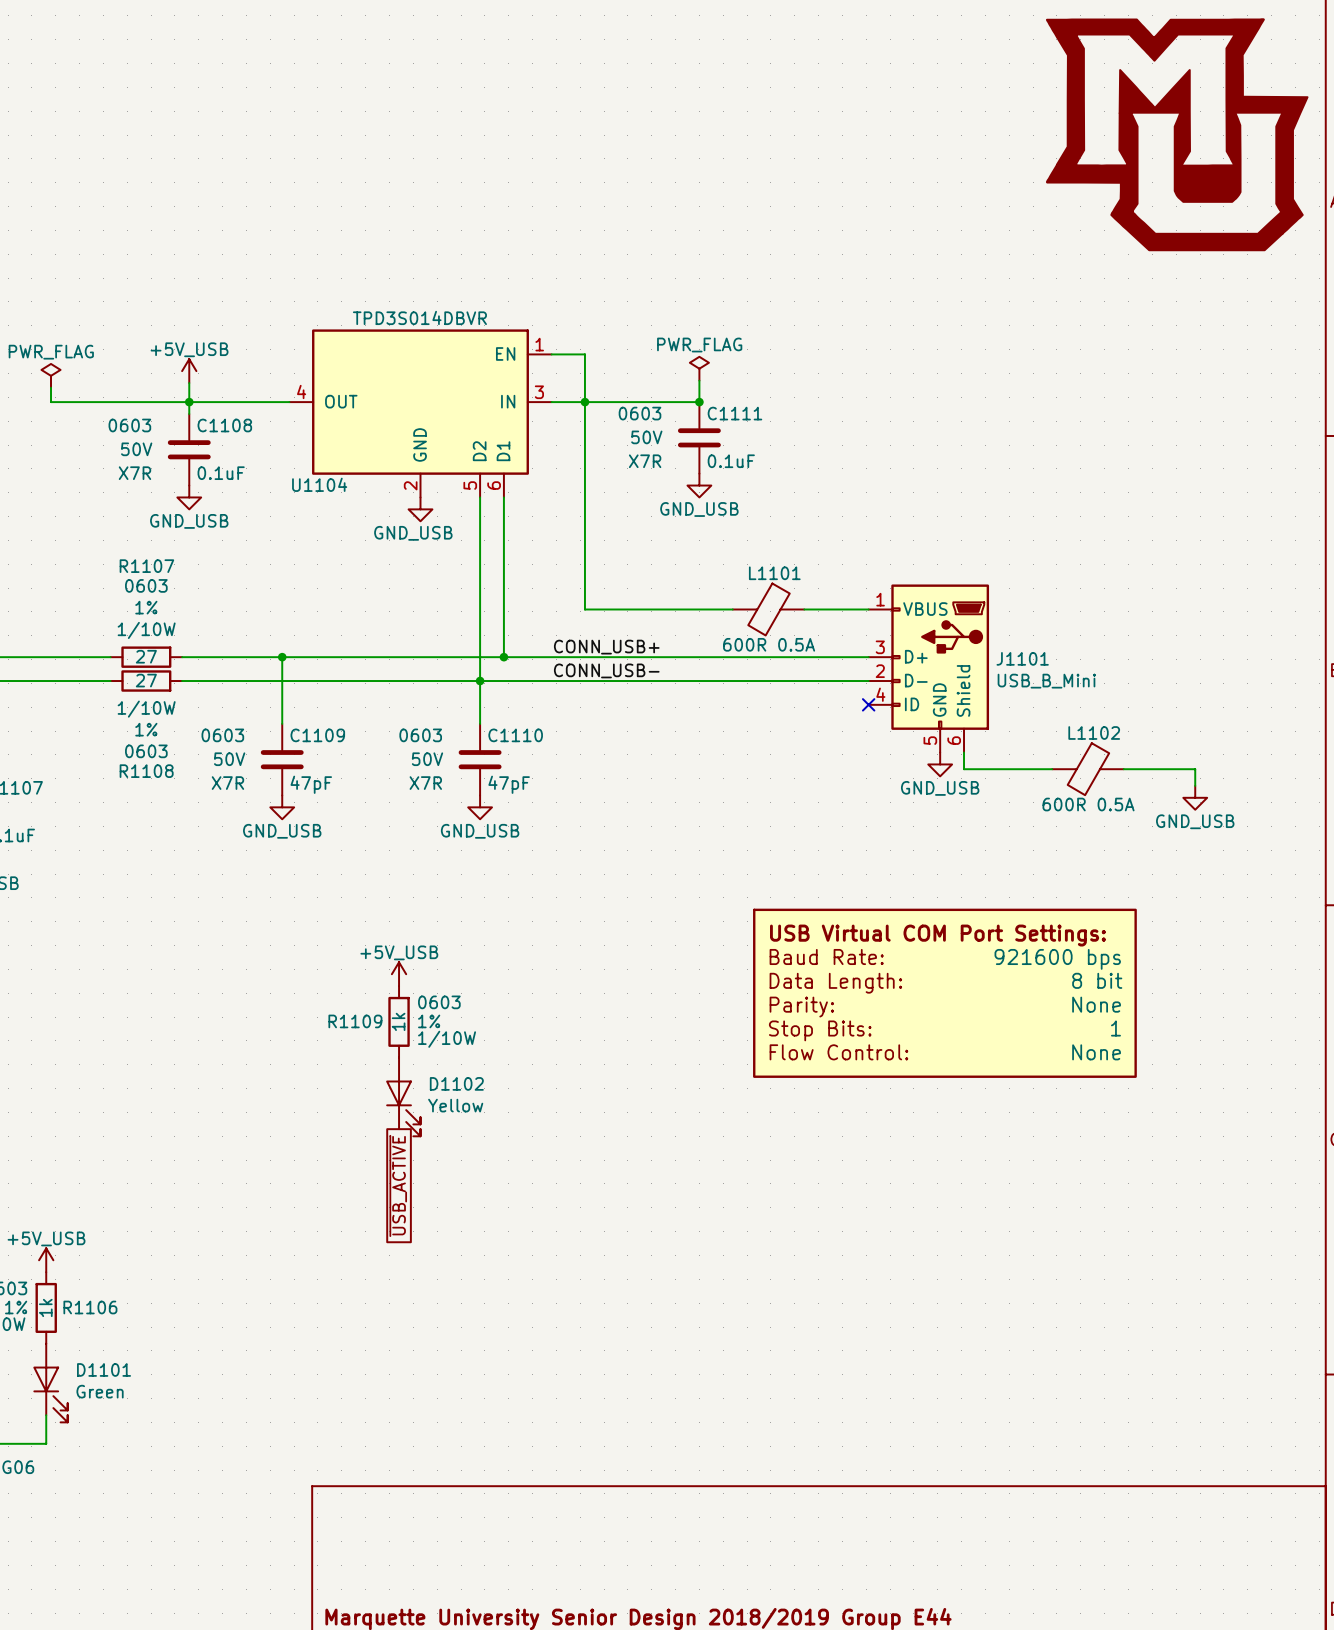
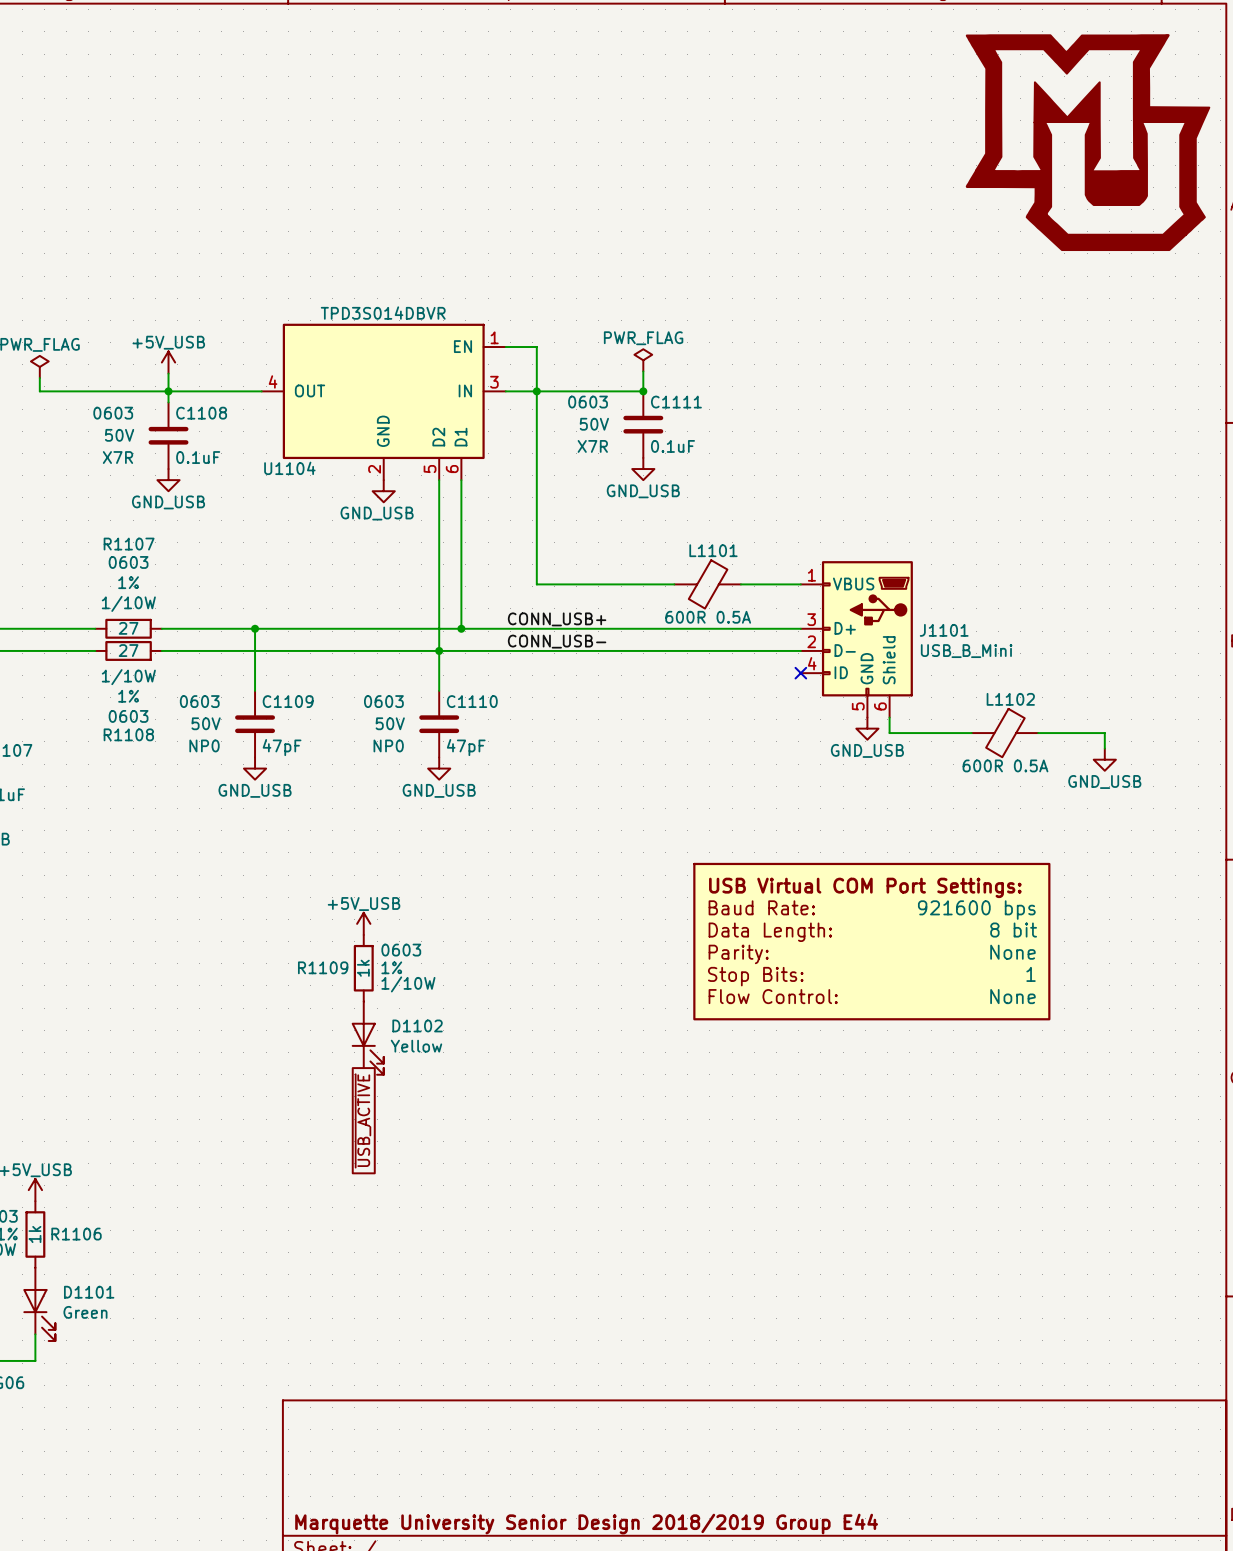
C1109 text: X7R (227, 783) -> NP0 (204, 745)
C1110 text: X7R (425, 783) -> NP0 (388, 745)

